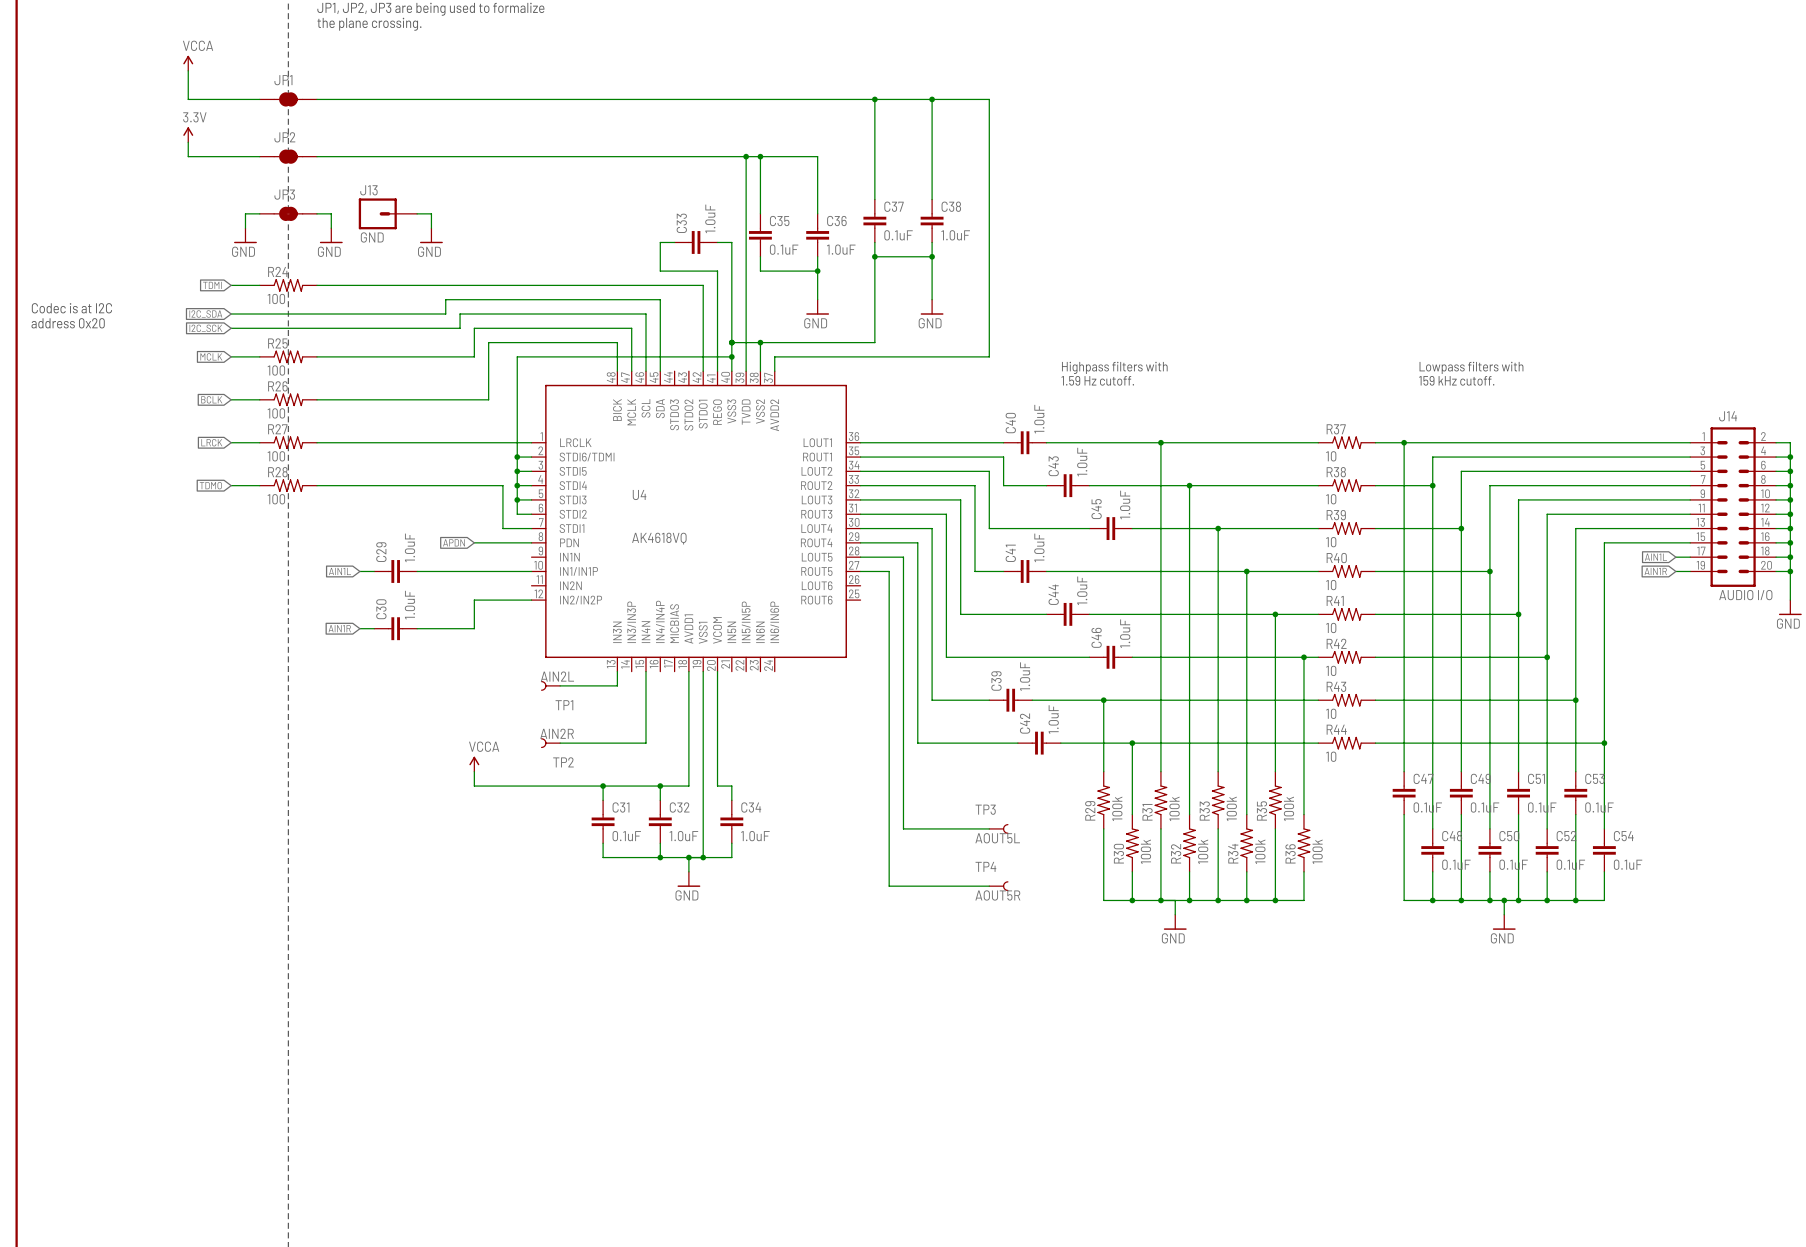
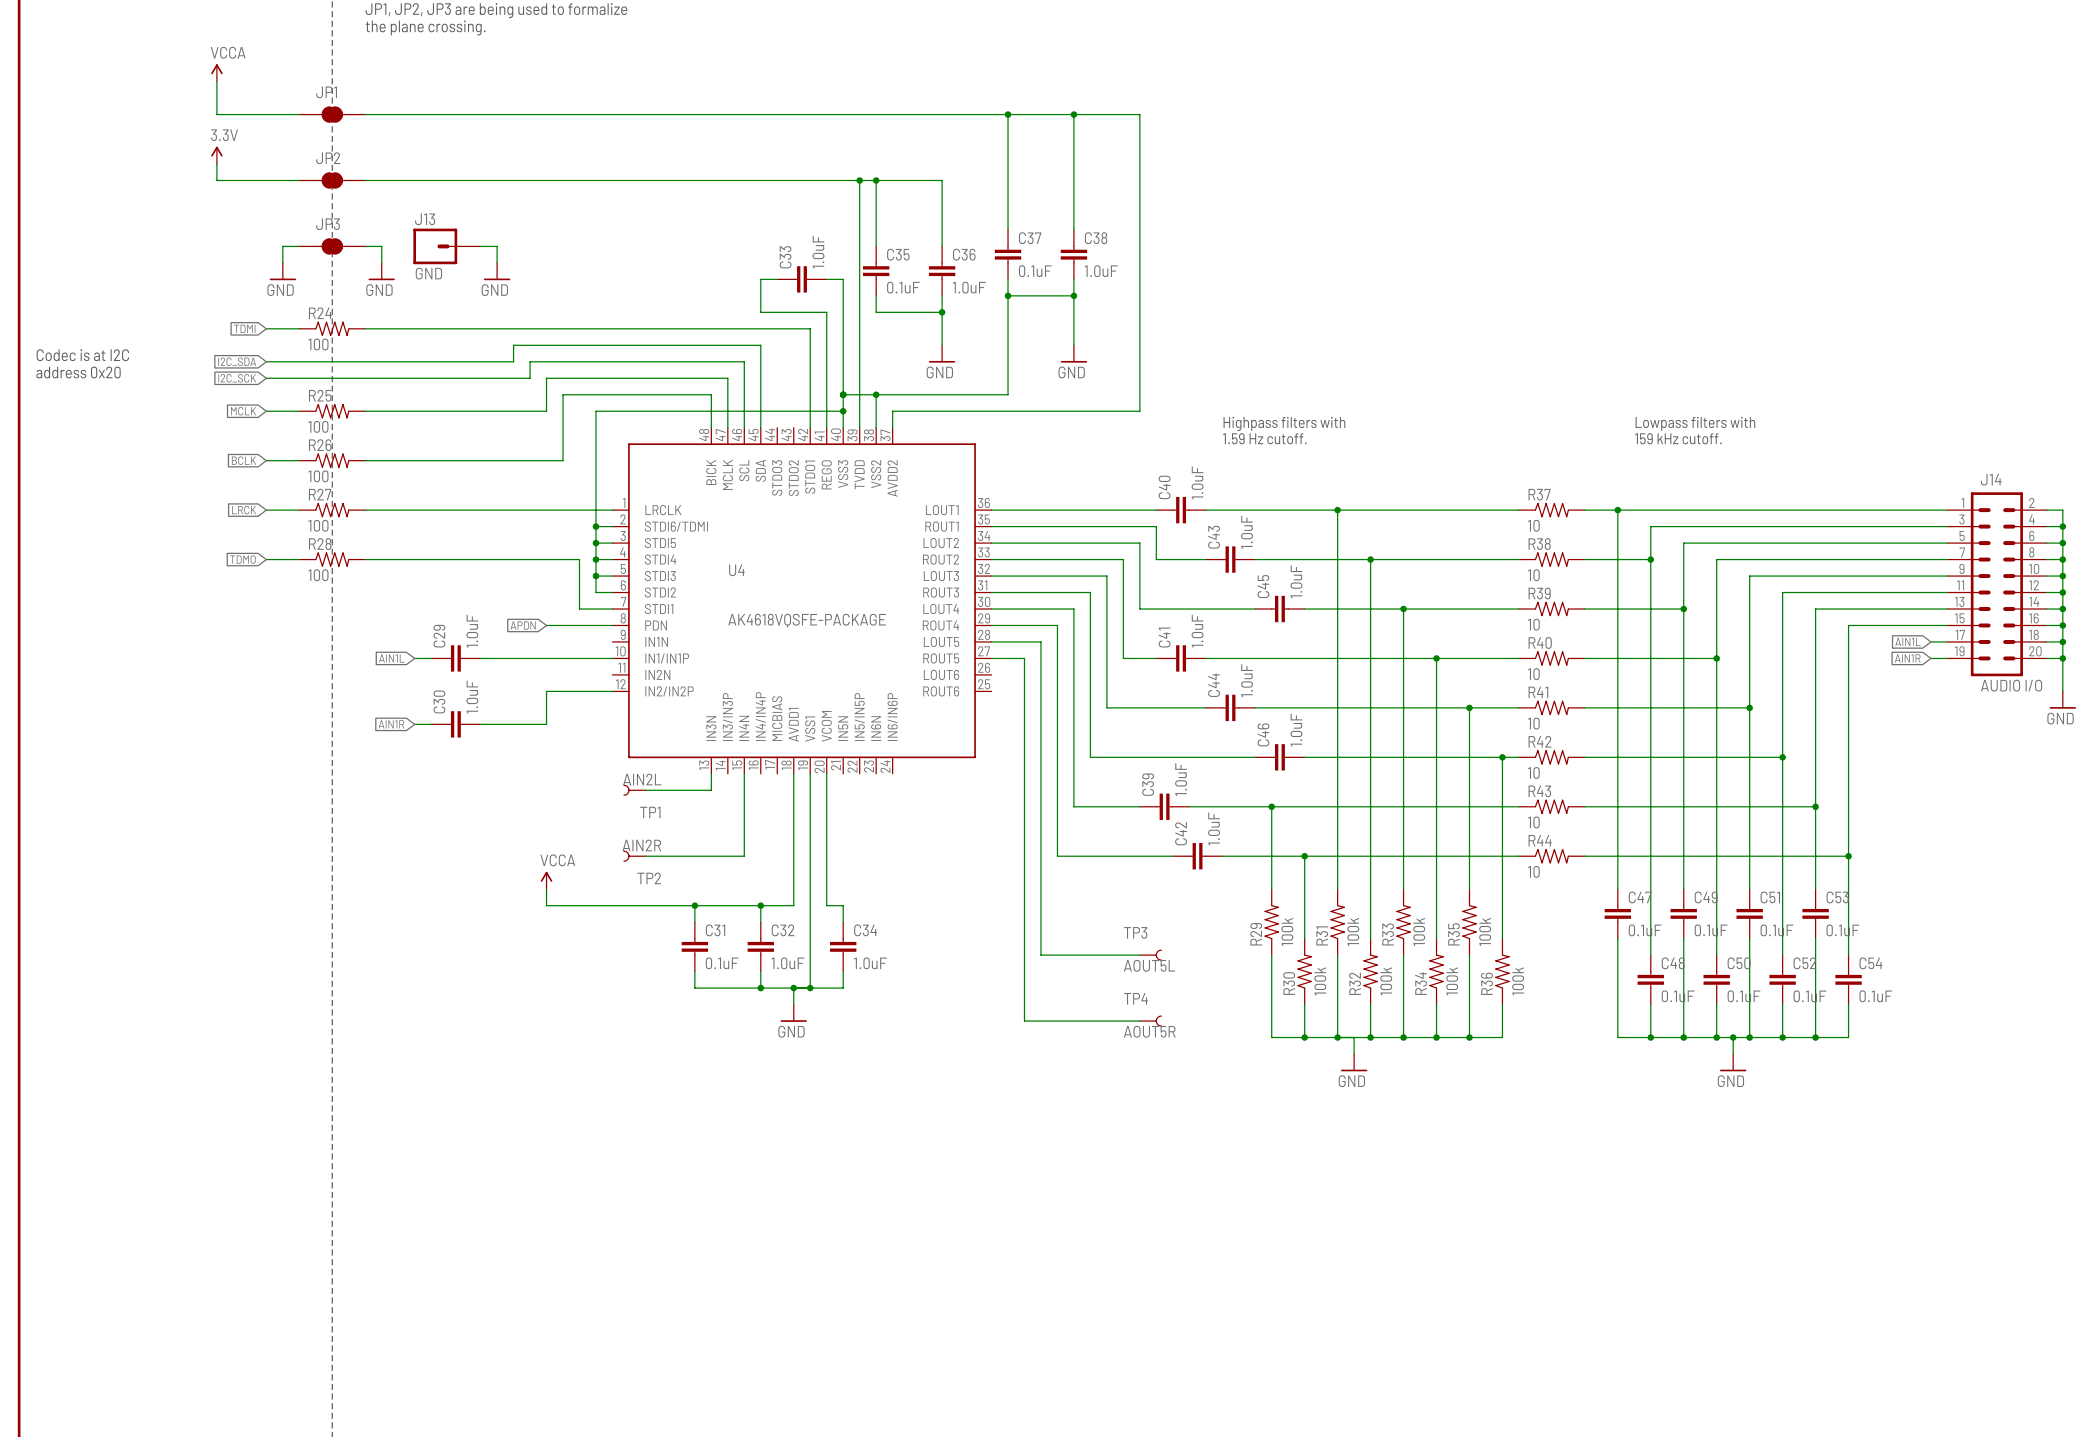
U4 value: AK4618VQ (659, 538) -> AK4618VQSFE-PACKAGE (807, 620)

